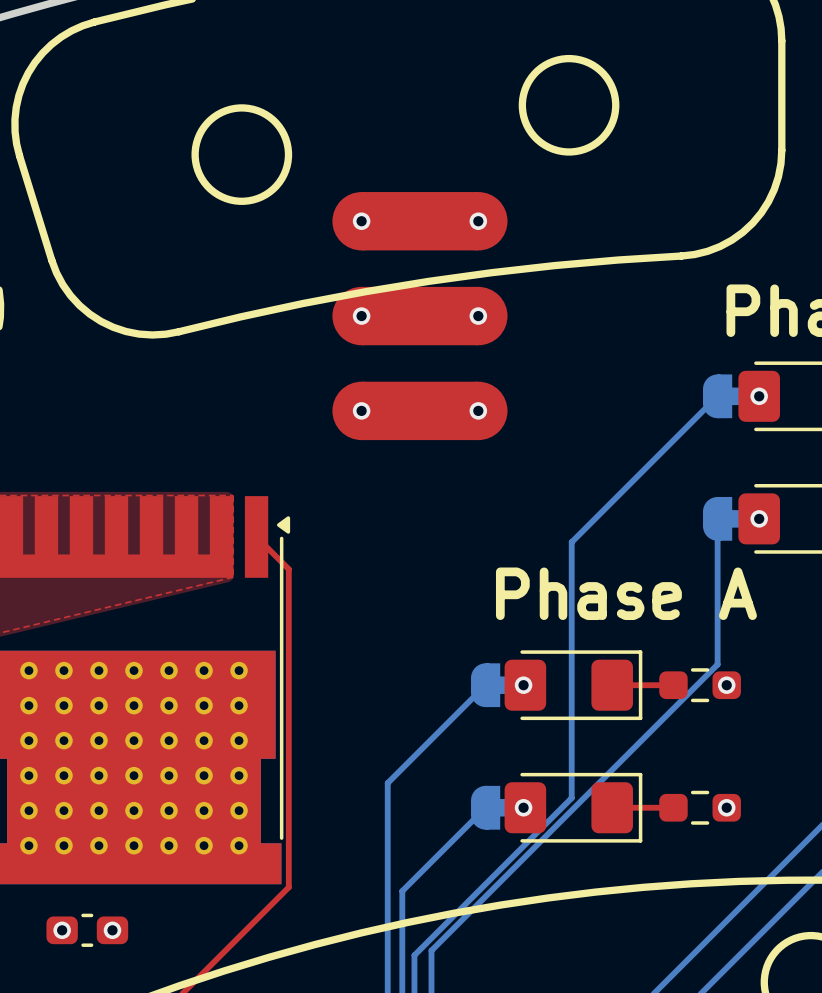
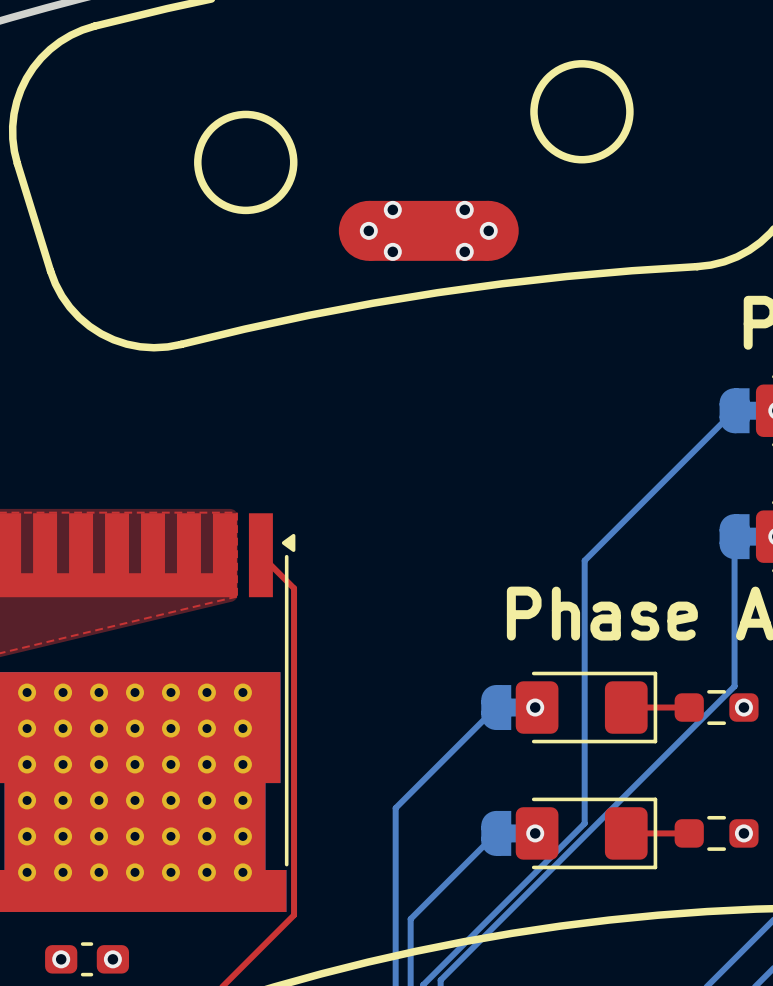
via: none -> (392, 209)
via: none -> (464, 209)
via: none -> (392, 251)
via: none -> (464, 251)
via: (361, 316) -> none
part: (419, 316) -> none
via: (478, 316) -> none
via: (361, 410) -> none
part: (419, 410) -> none
via: (478, 410) -> none

